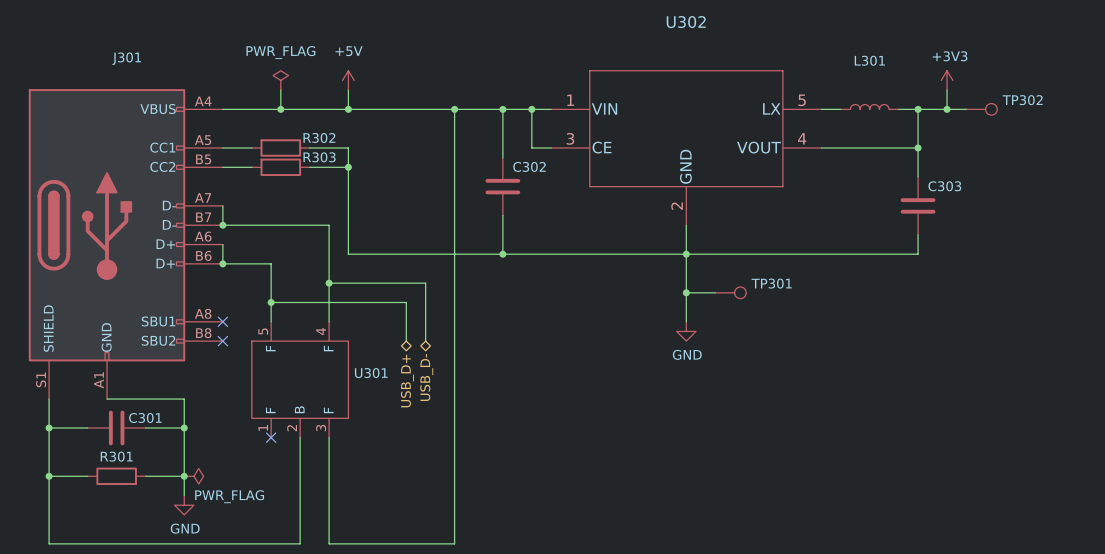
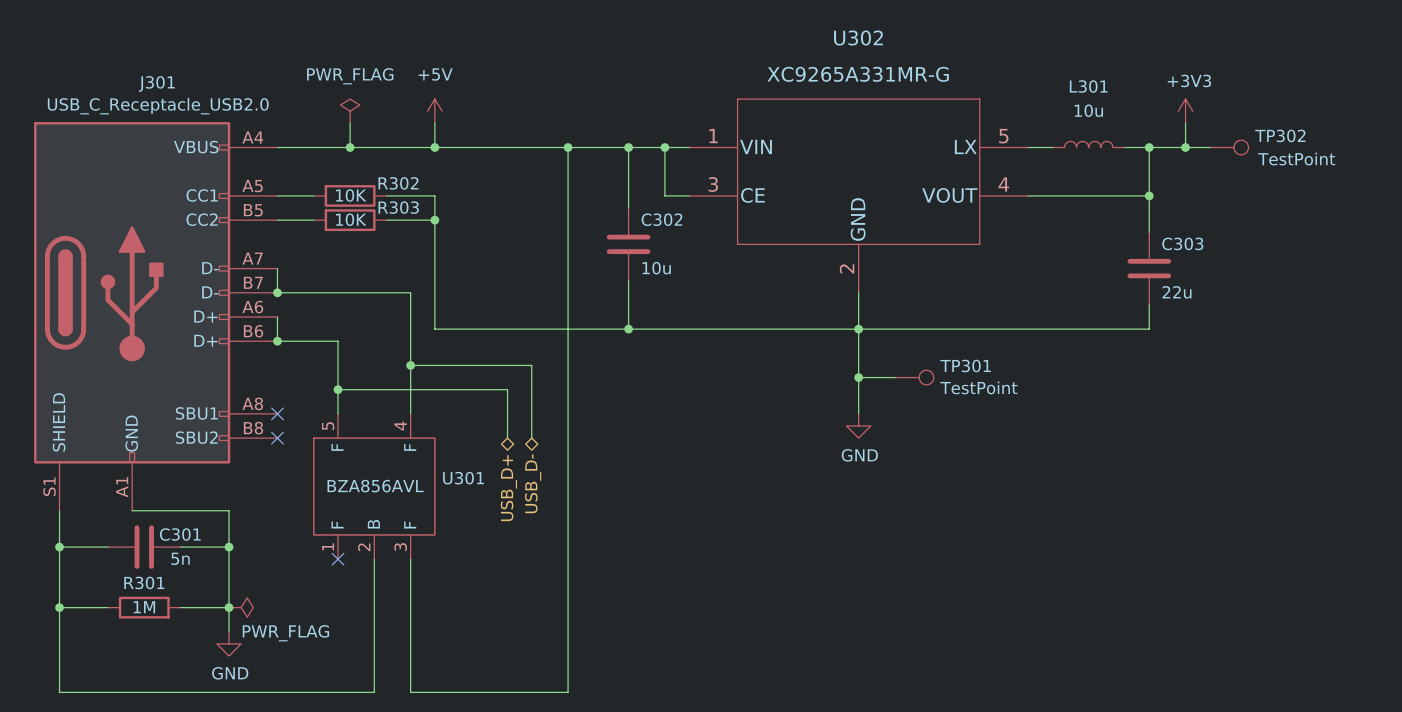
U302 value: none -> XC9265A331MR-G (858, 74)
J301 value: none -> USB_C_Receptacle_USB2.0 (158, 106)
L301 value: none -> 10u (1088, 110)
TP302 value: none -> TestPoint (1296, 159)
R302 value: none -> 10K (351, 195)
R303 value: none -> 10K (351, 219)
C302 value: none -> 10u (656, 268)
C303 value: none -> 22u (1177, 292)
TP301 value: none -> TestPoint (978, 387)
U301 value: none -> BZA856AVL (375, 486)
C301 value: none -> 5n (180, 558)
R301 value: none -> 1M (144, 607)

